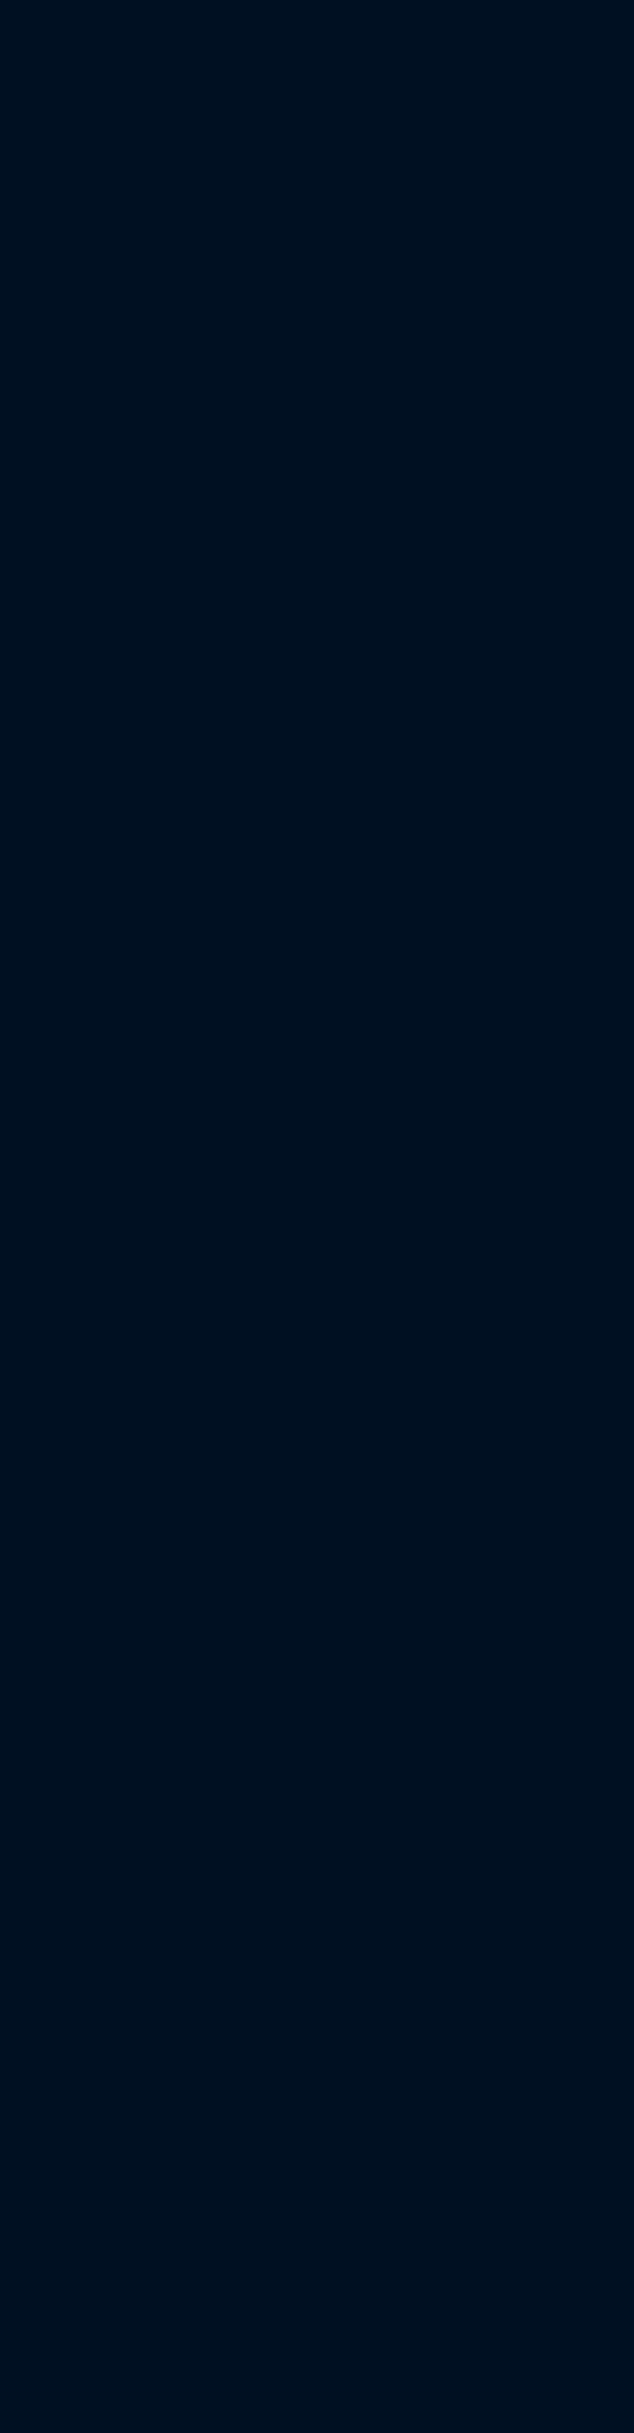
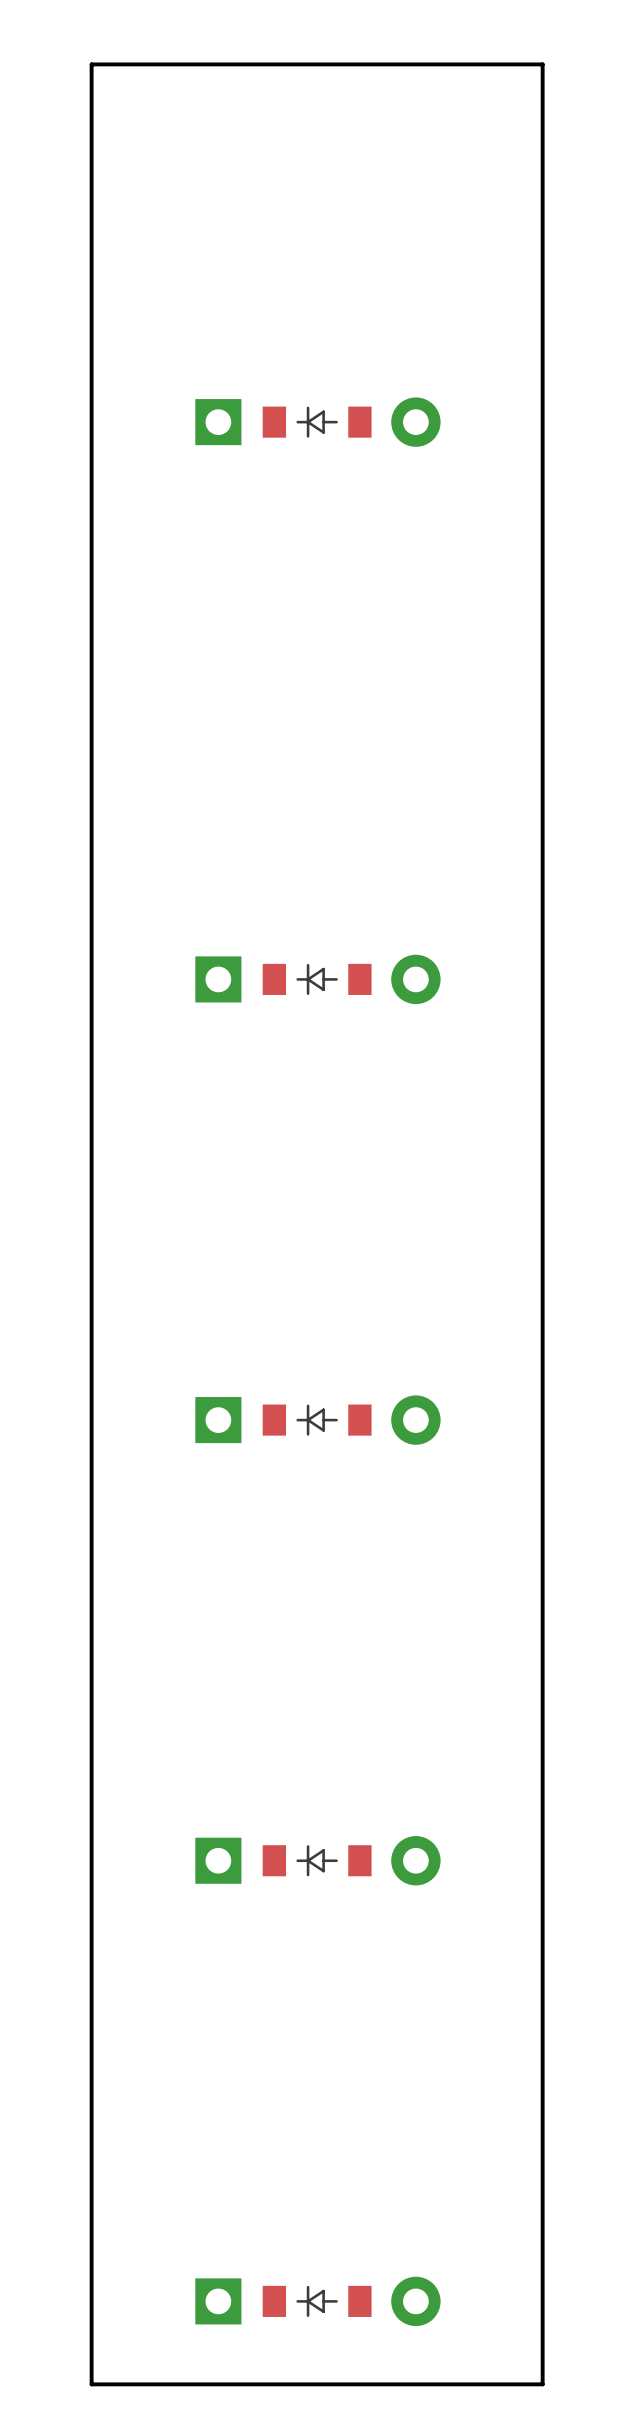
board edge: none -> (91, 64) (542, 64) (542, 2384) (91, 2384) (91, 64)
part: none -> (317, 422)
part: none -> (317, 979)
part: none -> (317, 1420)
part: none -> (317, 1860)
part: none -> (317, 2301)

